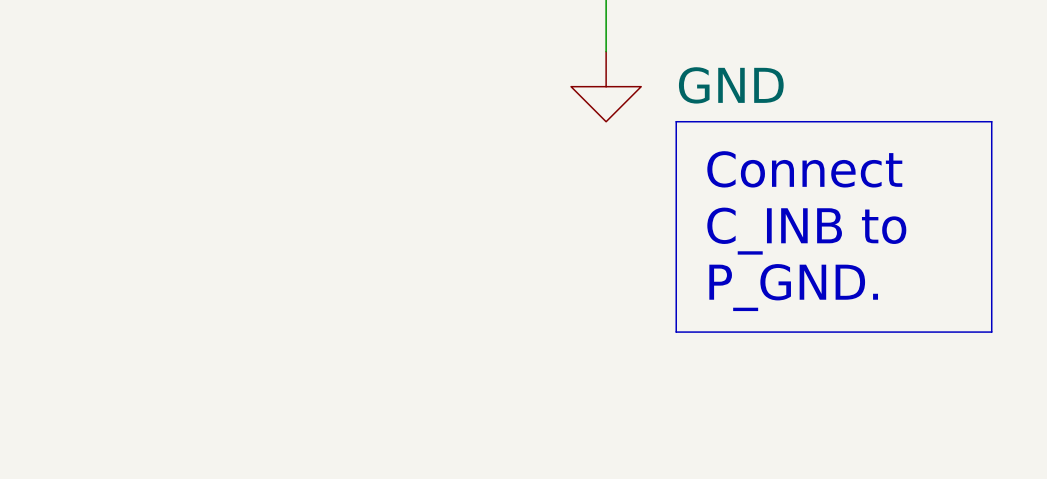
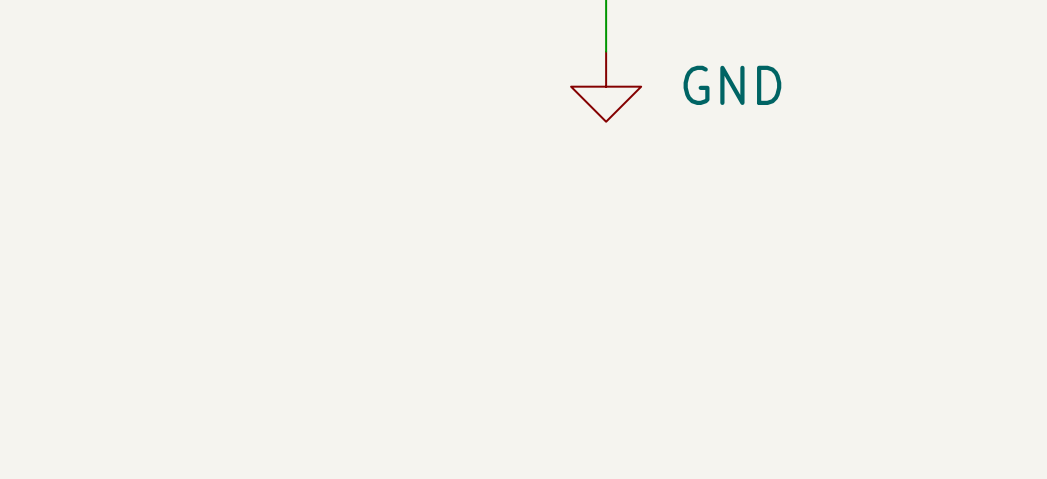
line: (676, 121) (991, 121) (991, 332) (676, 332) (676, 121) -> none
text: Connect (804, 169) -> none
text: C_INB to (806, 231) -> none
text: P_GND. (793, 287) -> none

